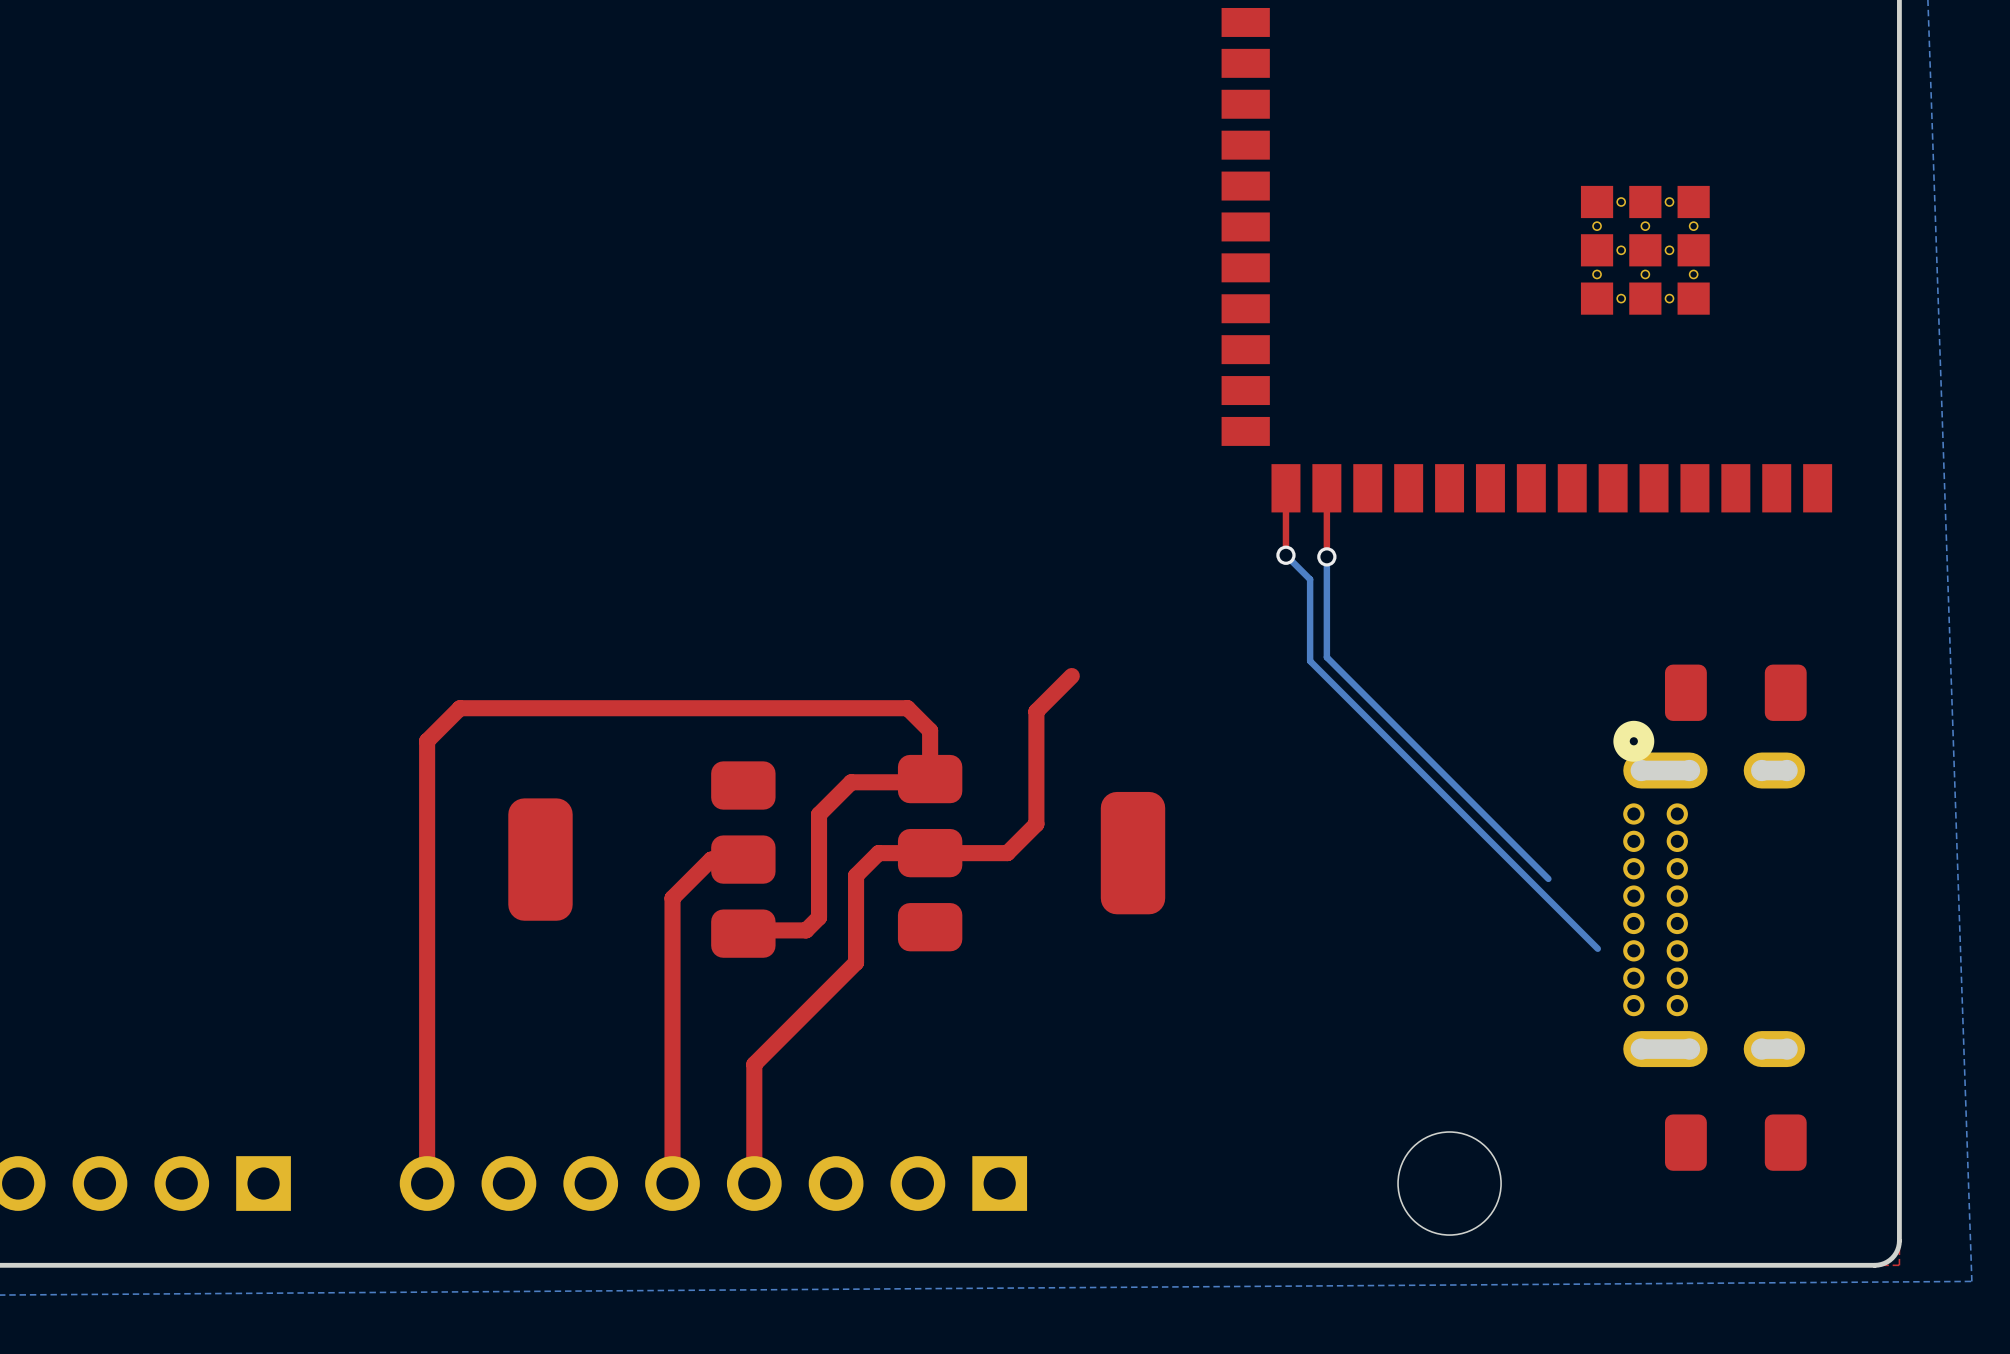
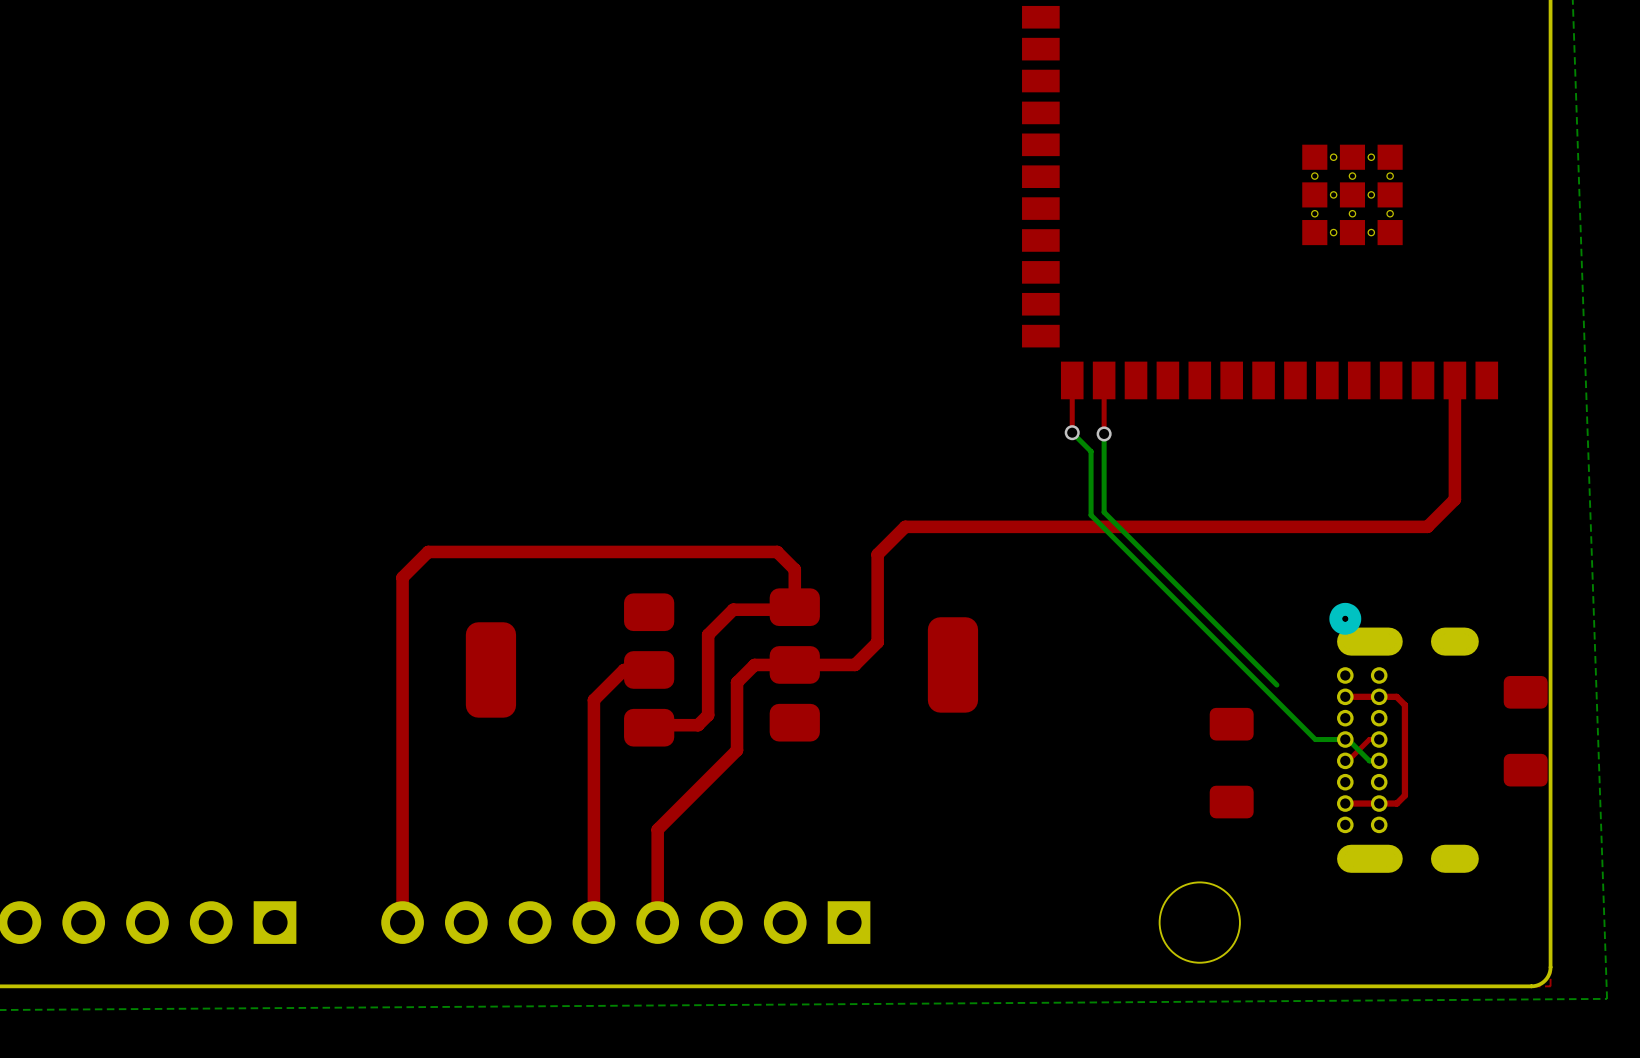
top track: none -> (1454, 380) (1454, 499) (1427, 526) (905, 526)
part: (1735, 692) -> none
part position: (1709, 893) -> (1404, 737)
top track: none -> (1345, 696) (1396, 696) (1404, 705) (1404, 795) (1396, 803) (1345, 803)
part: none -> (1525, 731)
bottom track: none -> (1345, 739) (1315, 739)
bottom track: none -> (1348, 739) (1369, 760) (1379, 760)
top track: none -> (1379, 739) (1369, 739) (1348, 760)
part: none -> (1231, 763)
part: (1735, 1142) -> none

